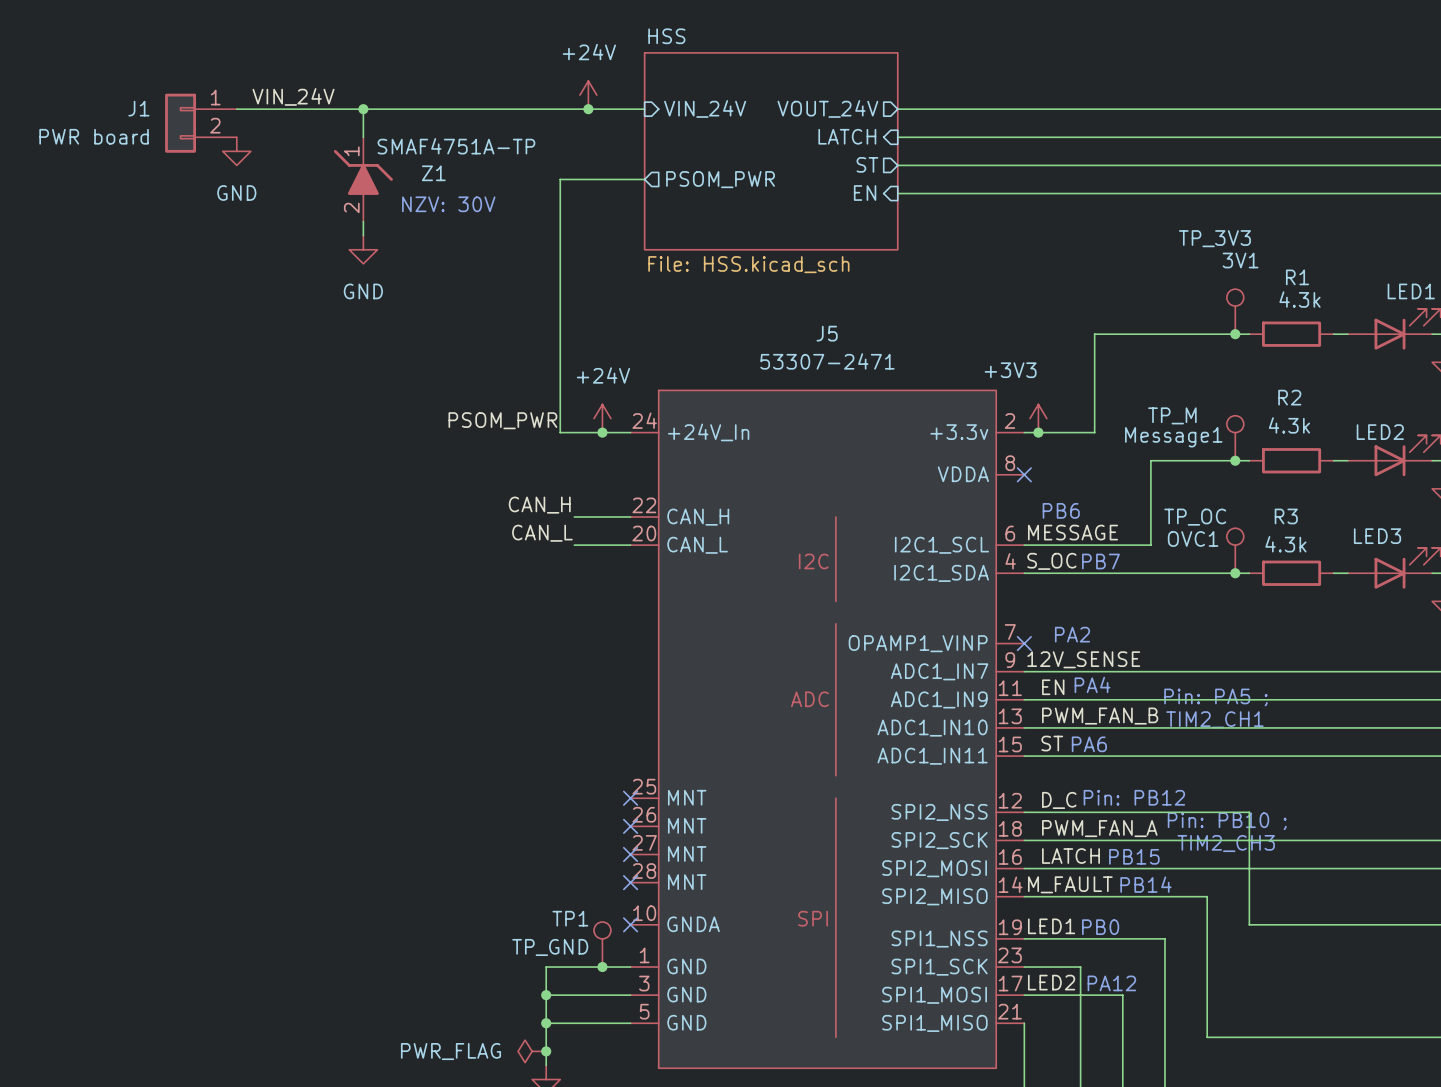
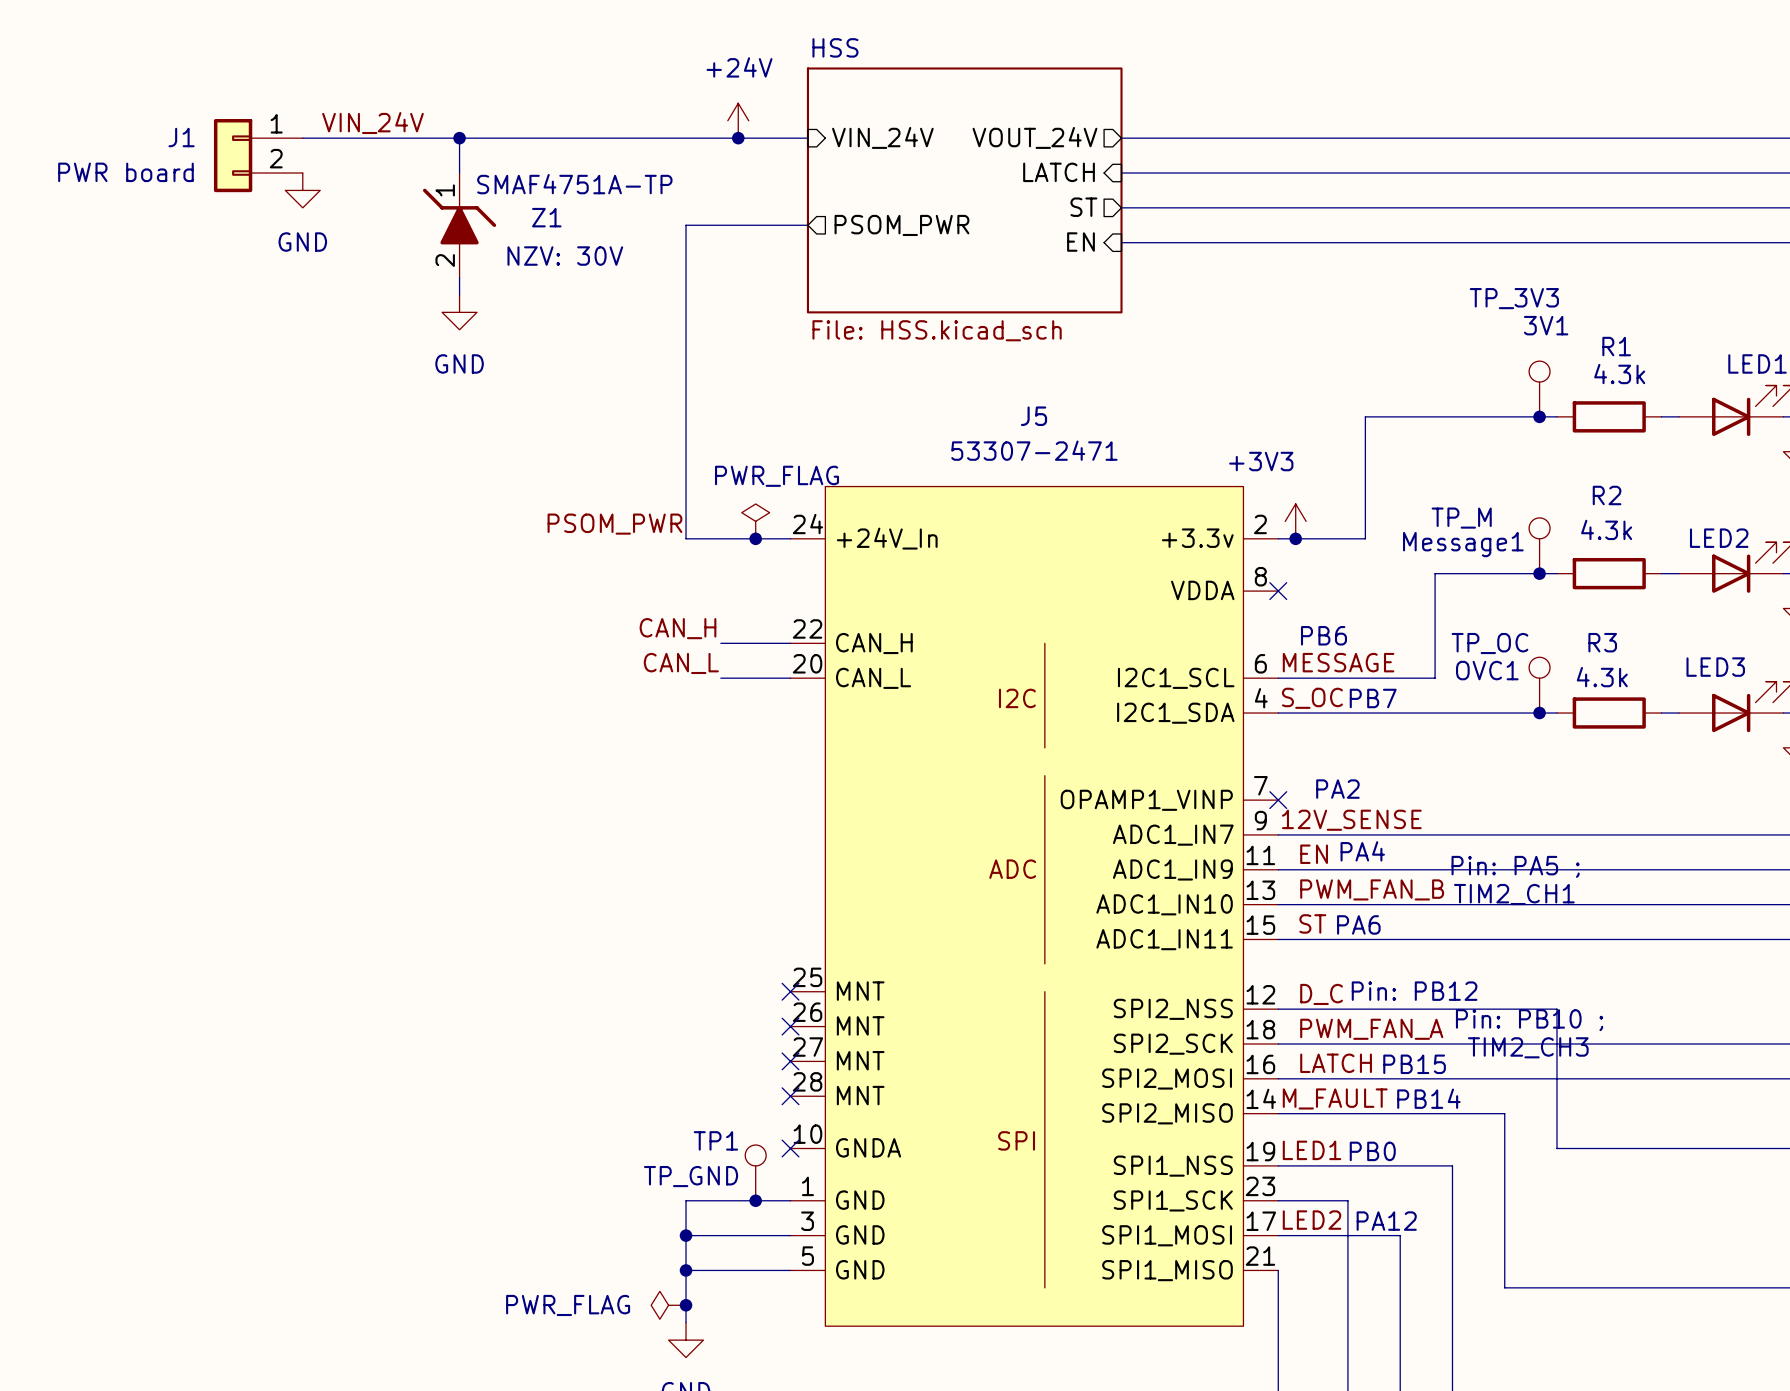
wire: (560, 179) (560, 432) -> (703, 225) (686, 225) (686, 538) (703, 538)
power symbol: +24V (602, 418) -> PWR_FLAG (755, 521)
label position: PSOM_PWR (502, 420) -> PSOM_PWR (614, 524)

